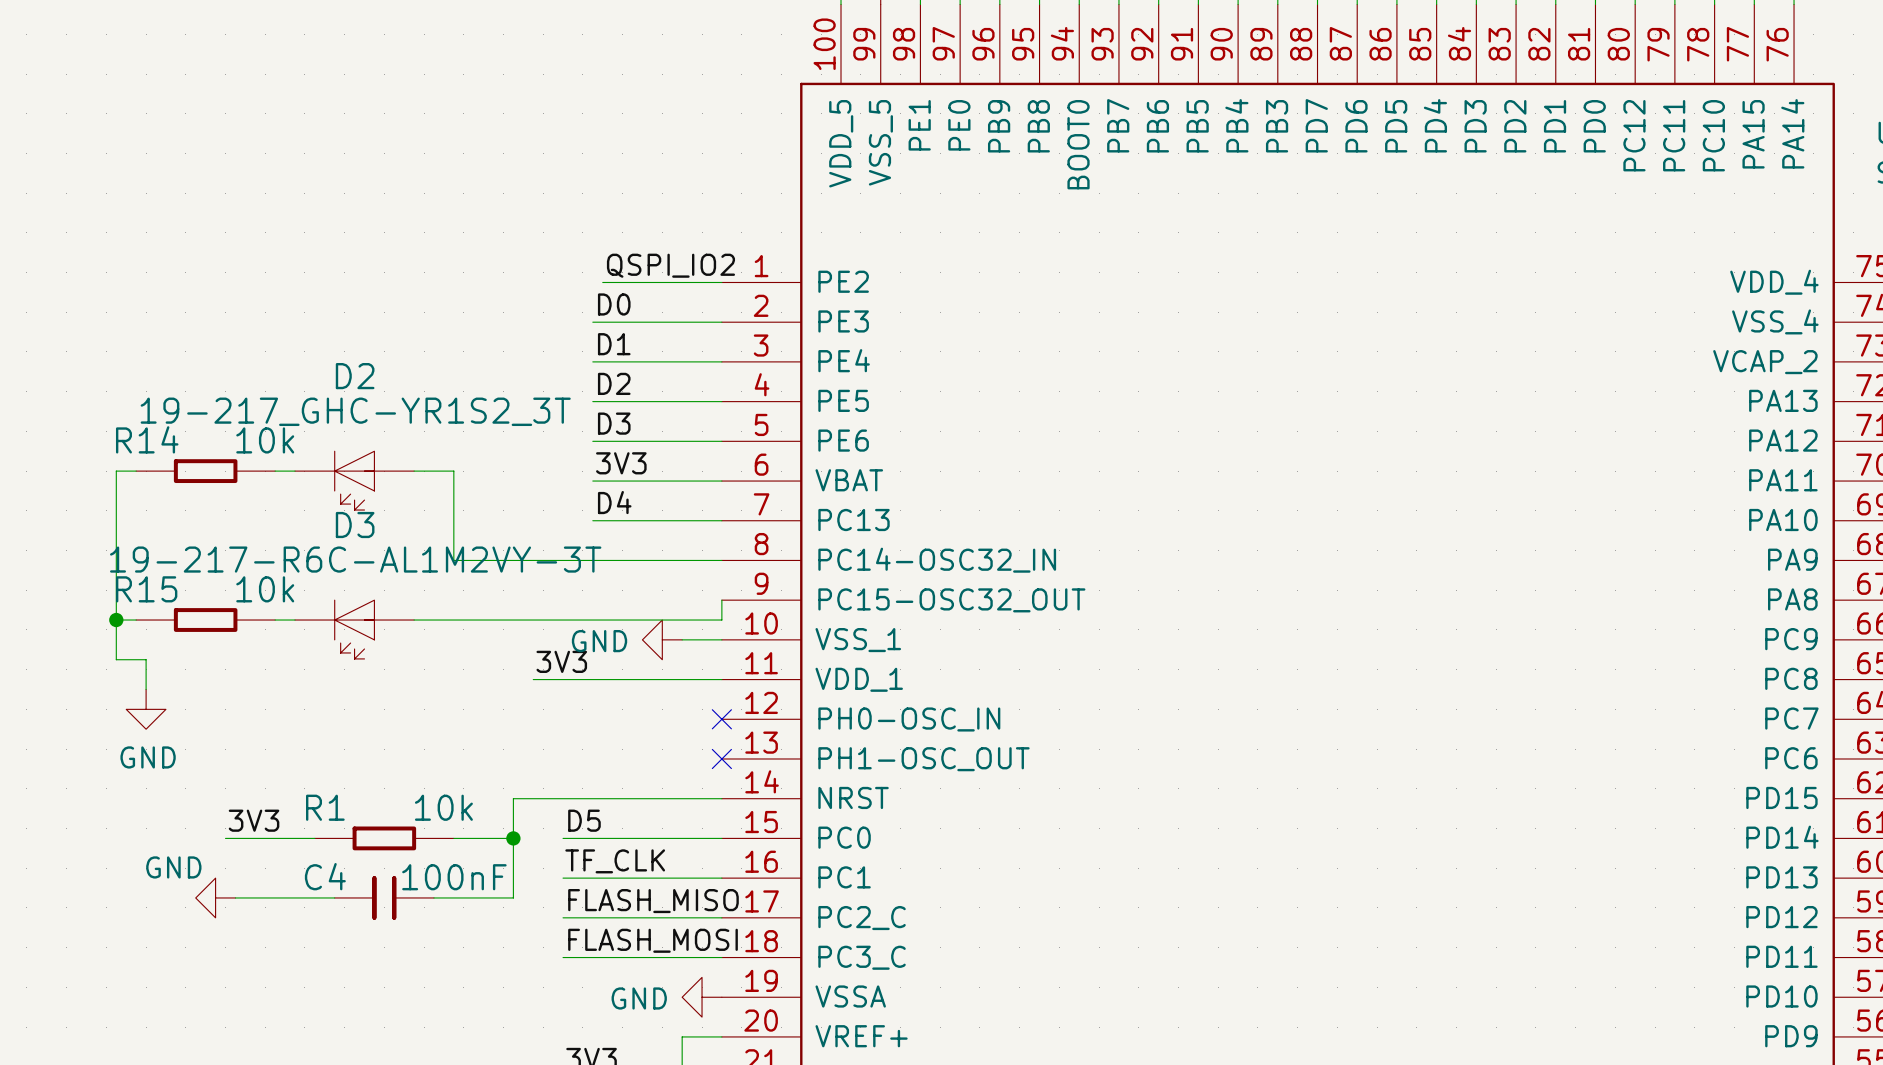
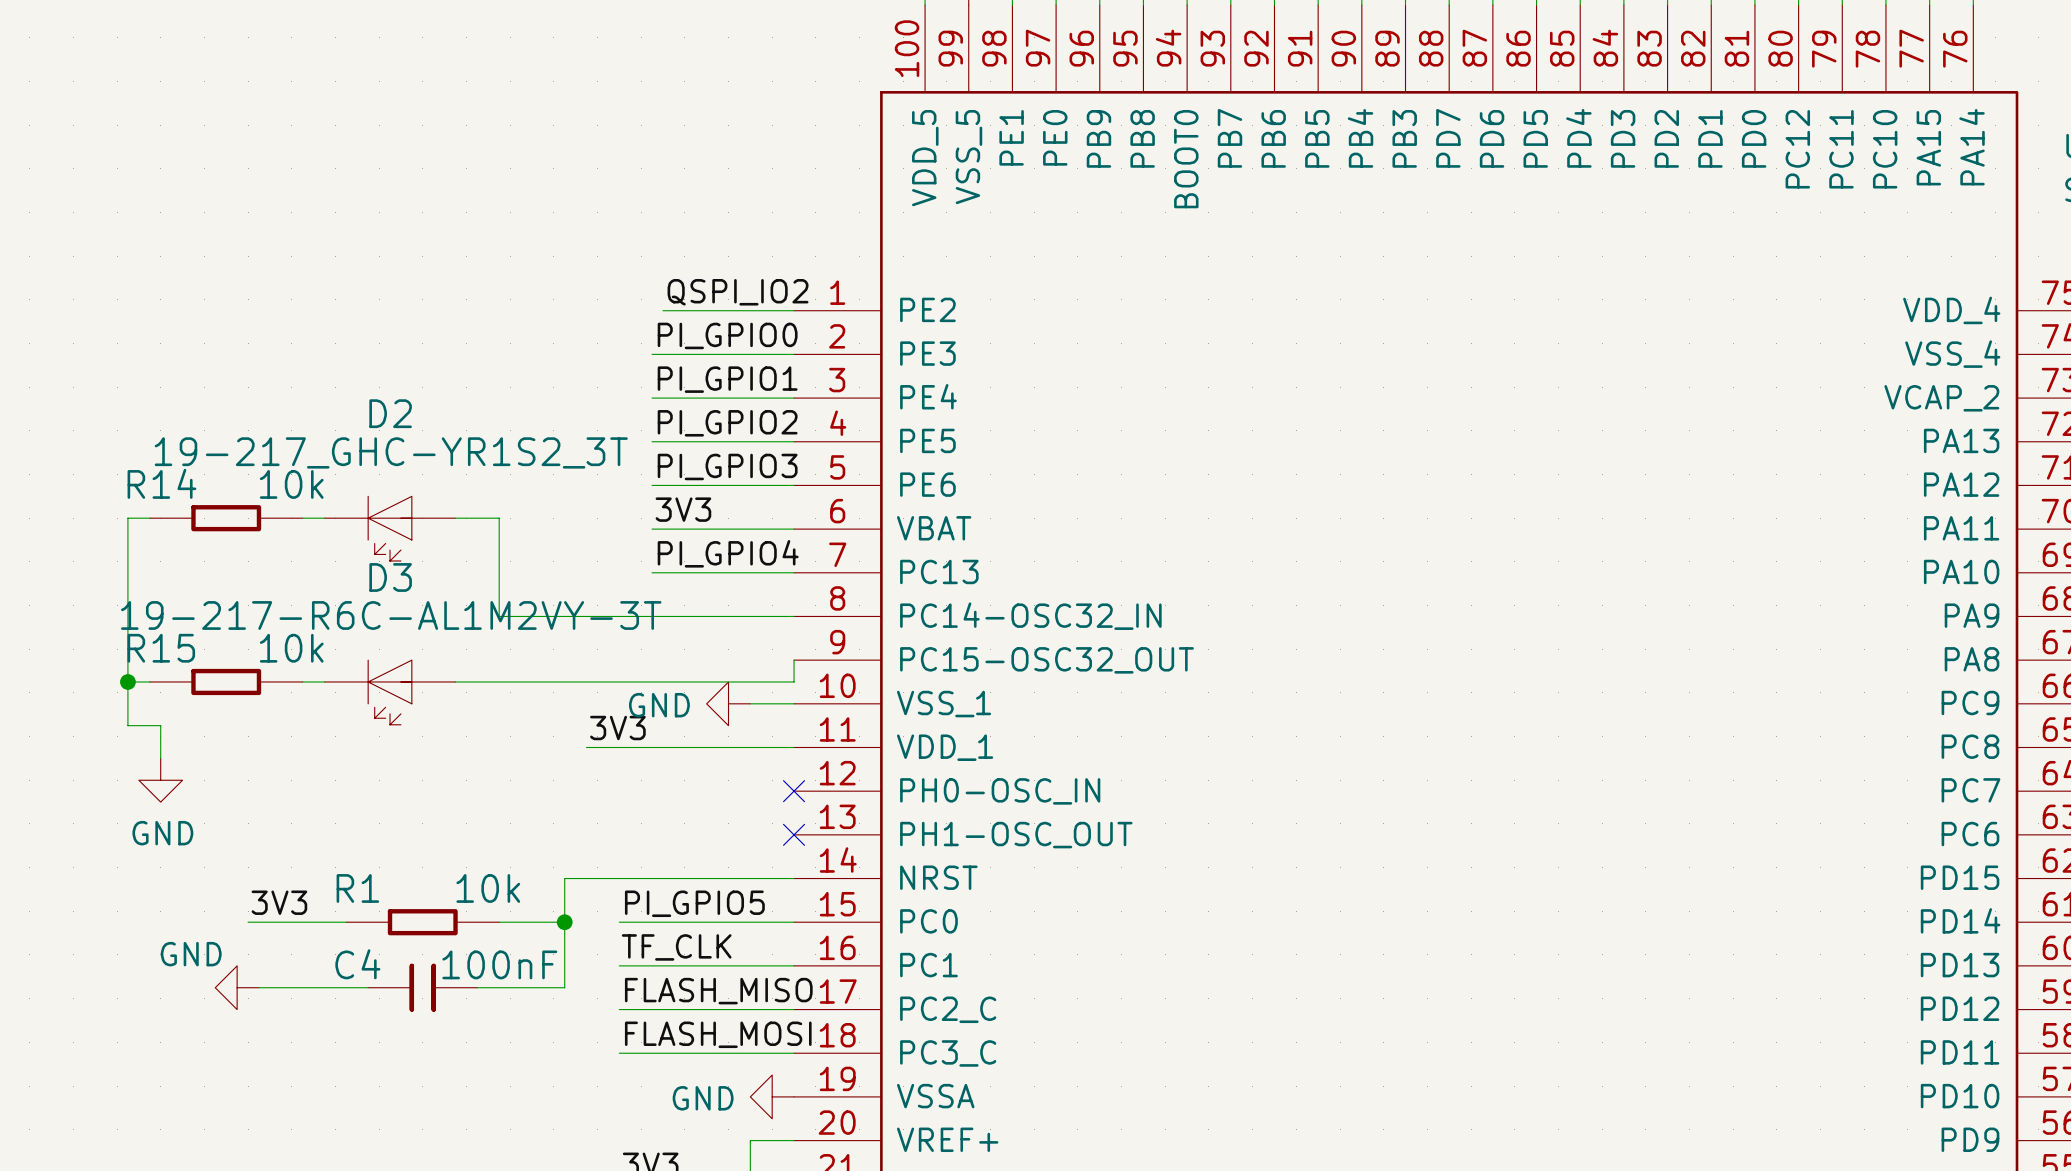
label: D0 (614, 304) -> PI_GPIO0 (727, 335)
label: D1 (614, 344) -> PI_GPIO1 (727, 379)
label: D2 (614, 383) -> PI_GPIO2 (727, 423)
label: D3 (614, 423) -> PI_GPIO3 (727, 466)
label: D4 (614, 502) -> PI_GPIO4 (728, 553)
label: D5 (584, 820) -> PI_GPIO5 (694, 903)

